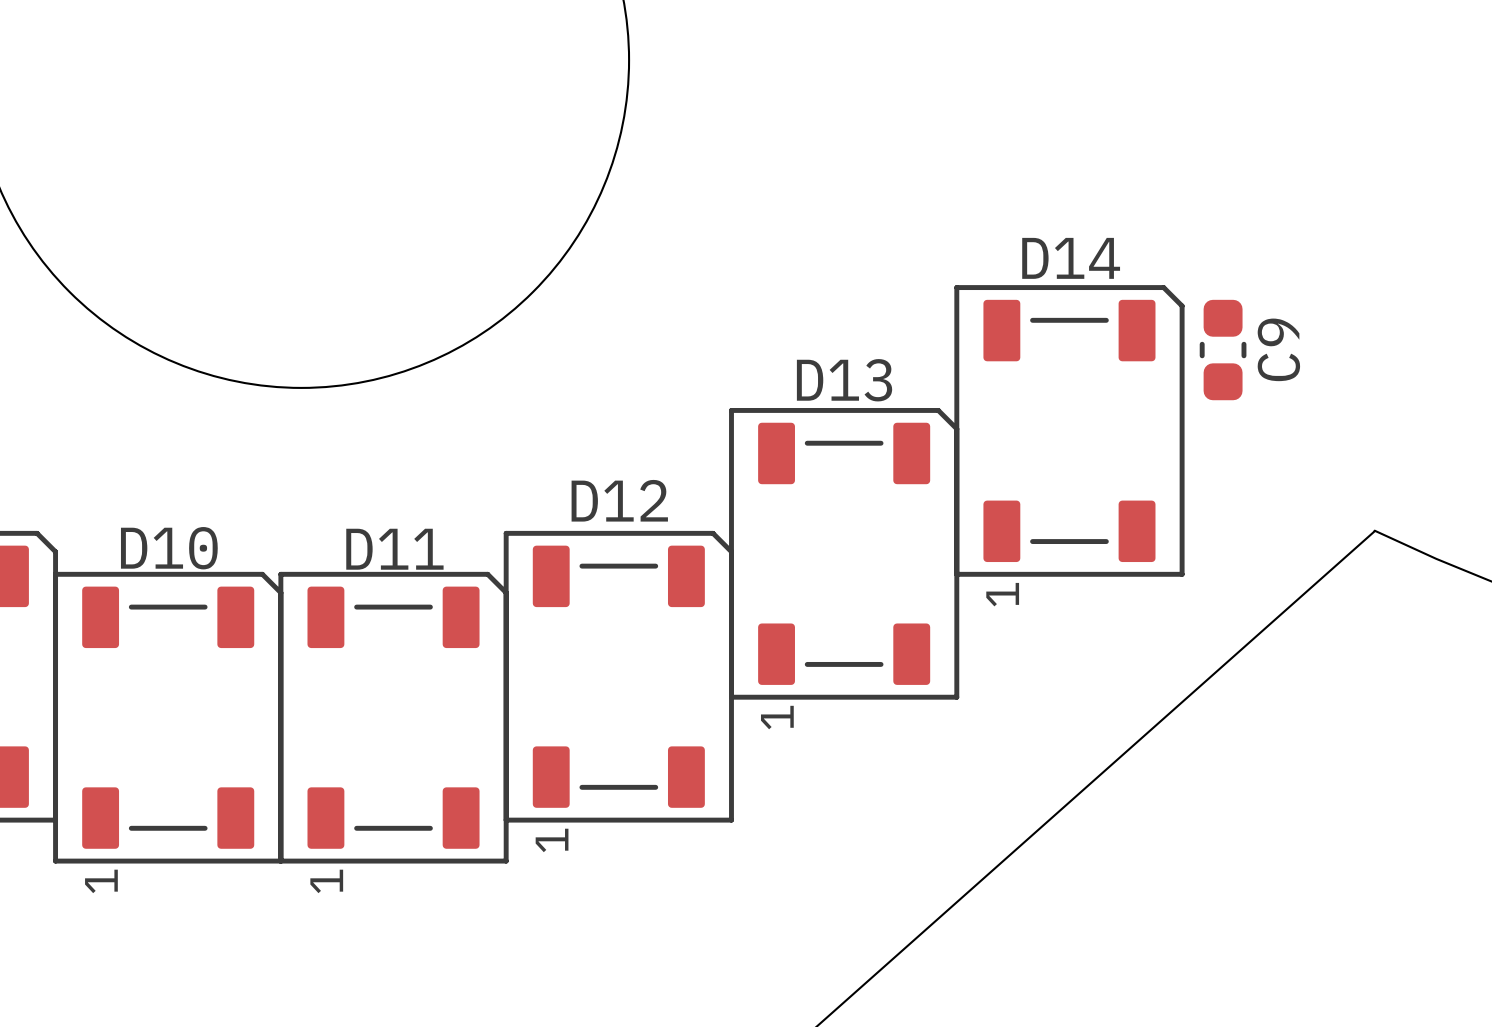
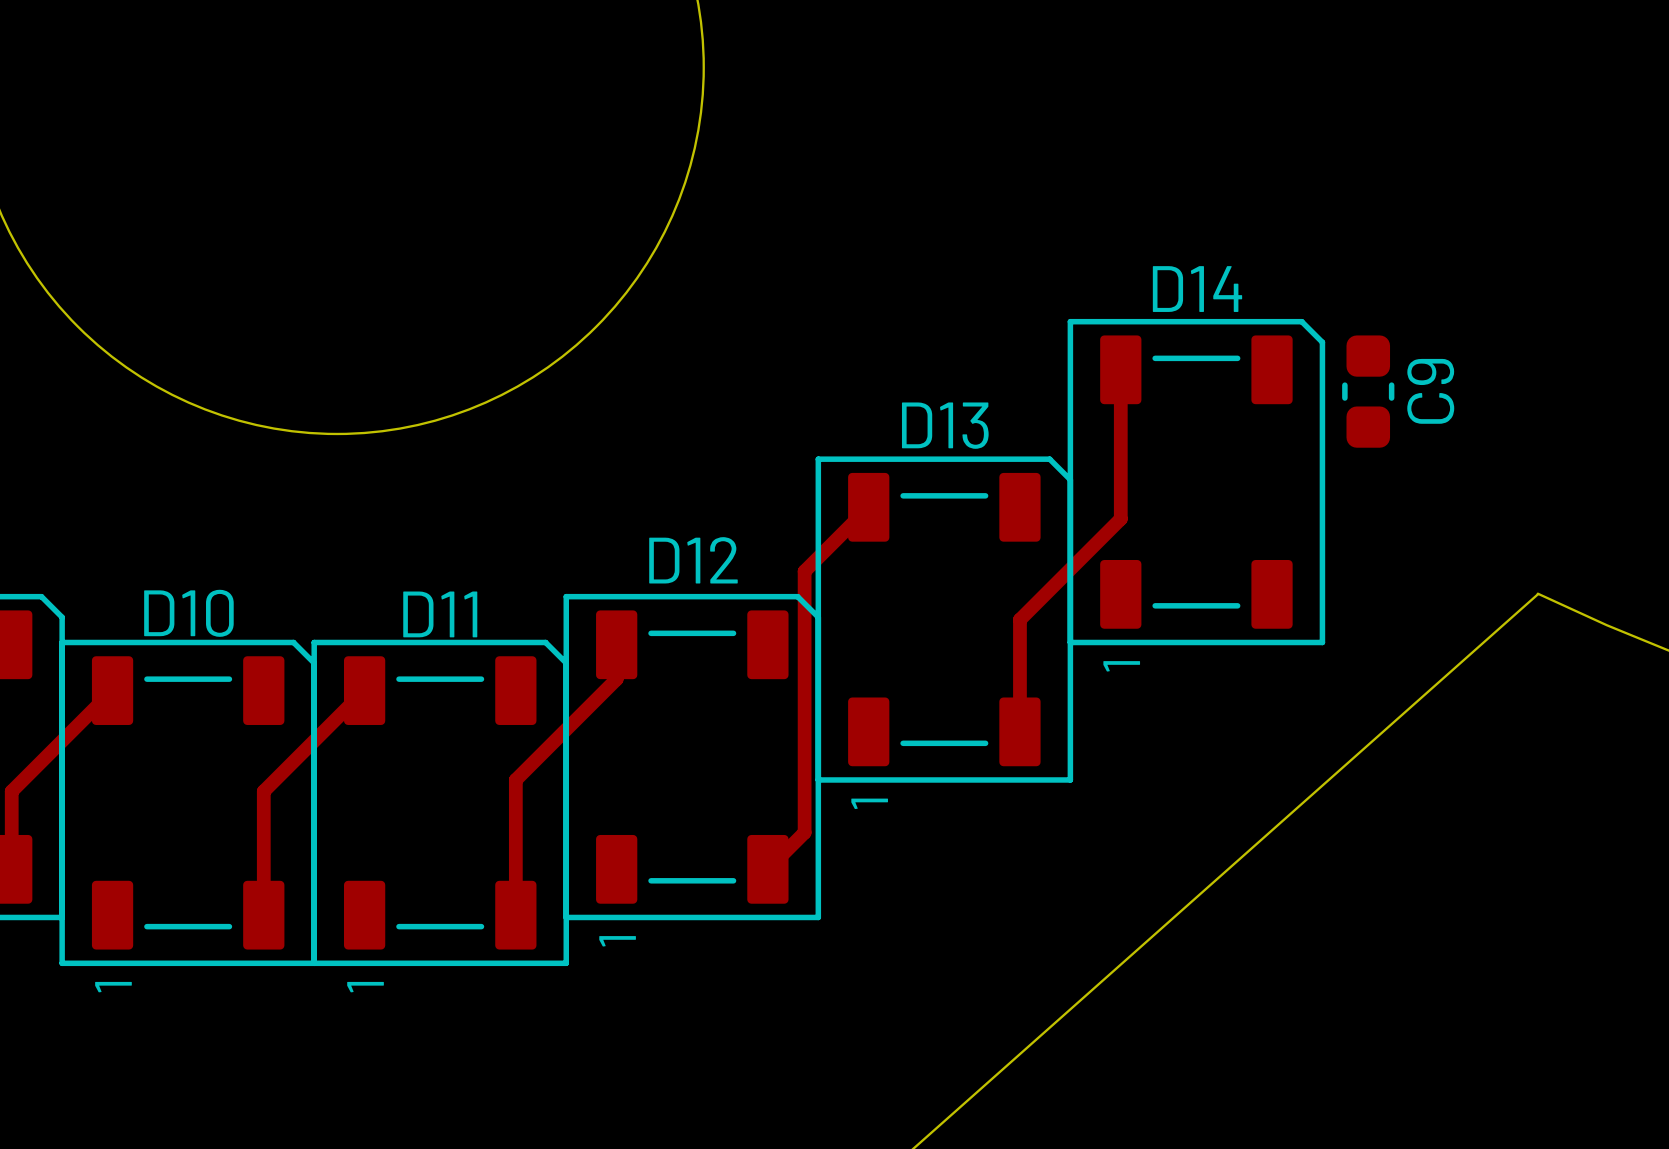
track: none -> (1120, 369) (1120, 518) (1019, 619) (1019, 731)
track: none -> (868, 507) (804, 571) (804, 832) (767, 869)
track: none -> (616, 644) (616, 679) (515, 779) (515, 915)
track: none -> (112, 690) (11, 791) (11, 869)
track: none -> (364, 690) (263, 791) (263, 915)

